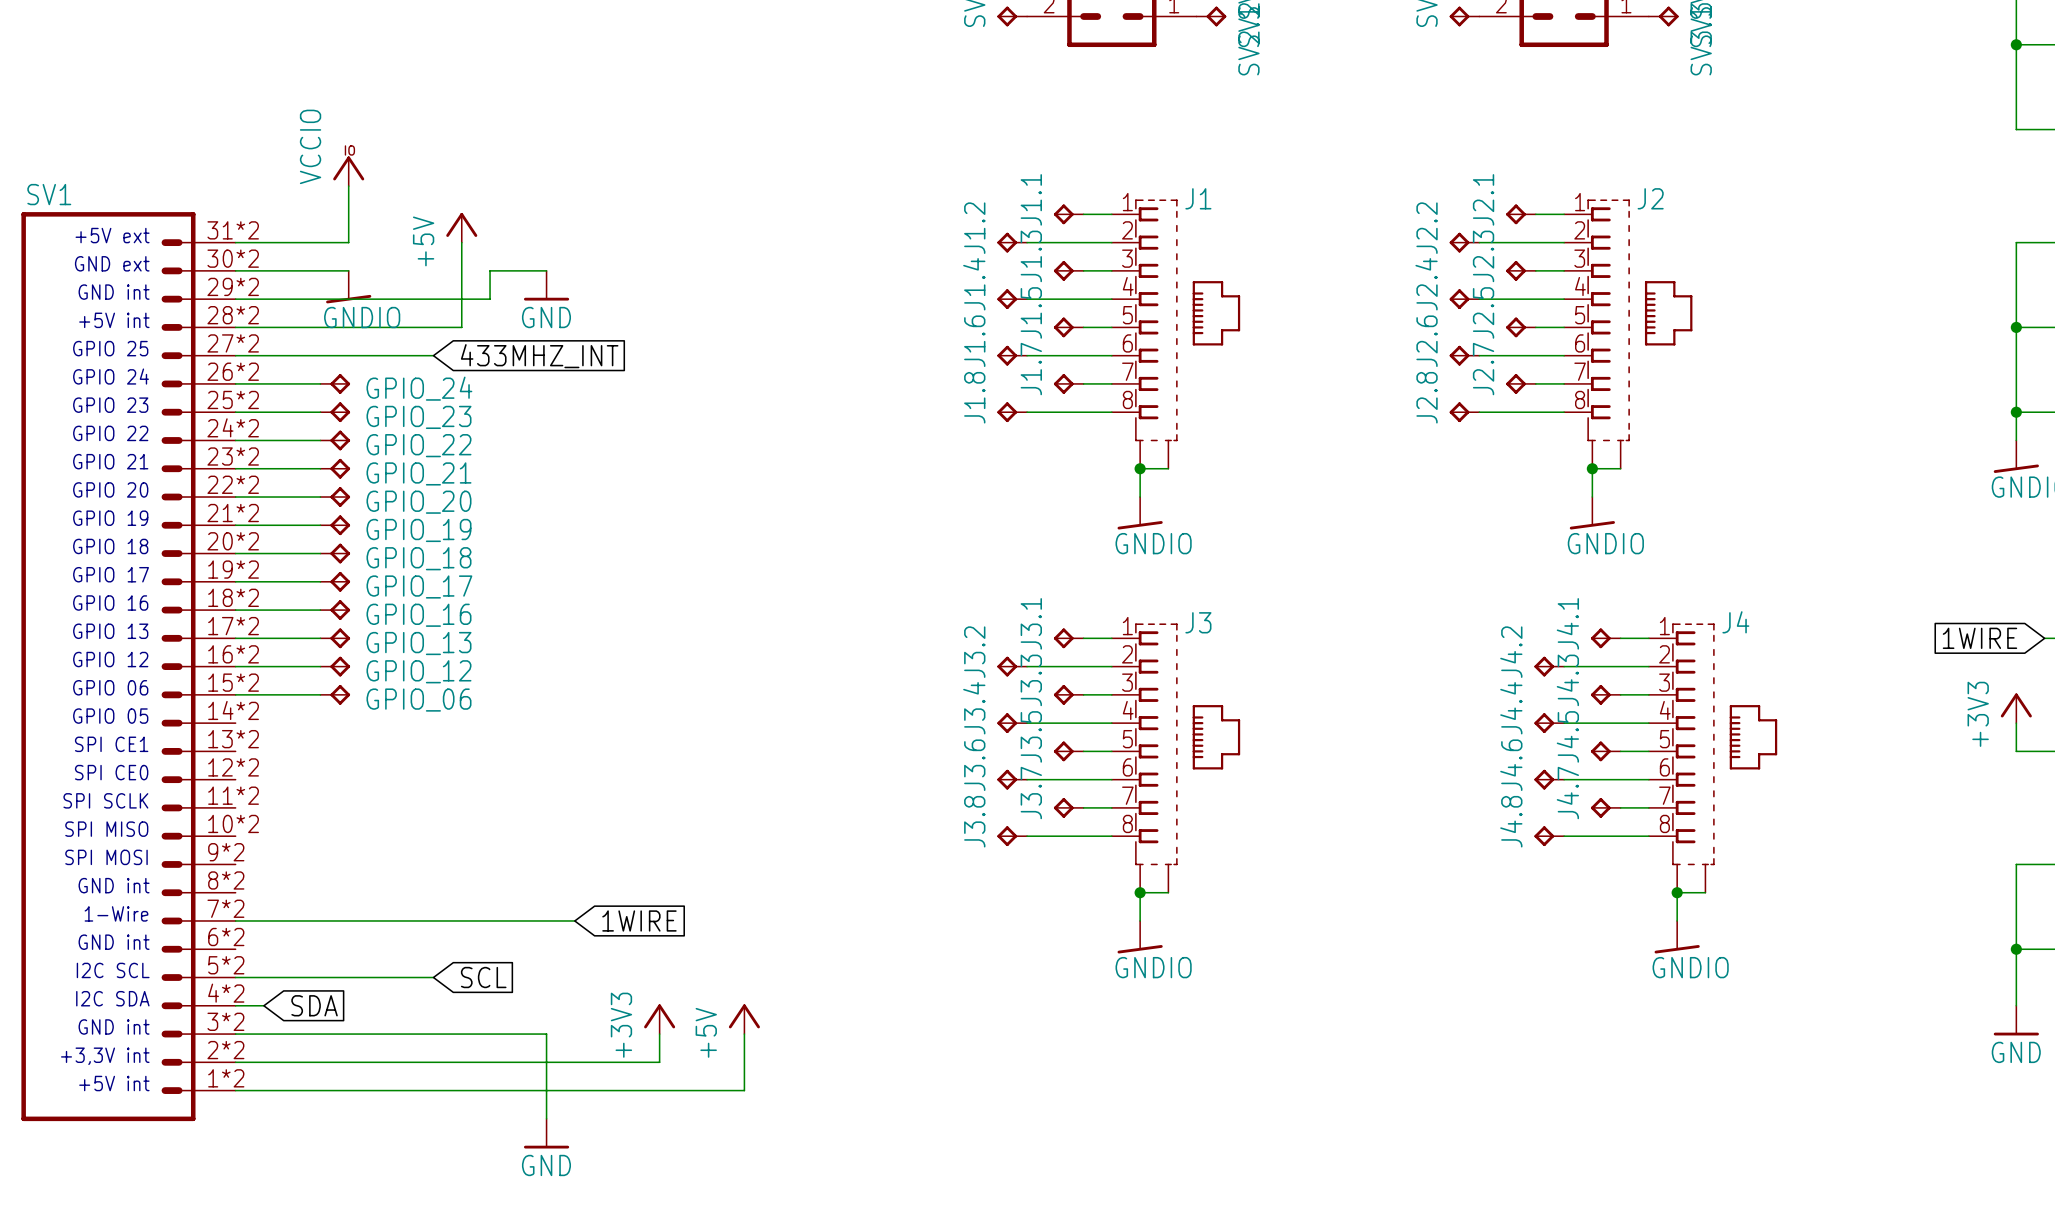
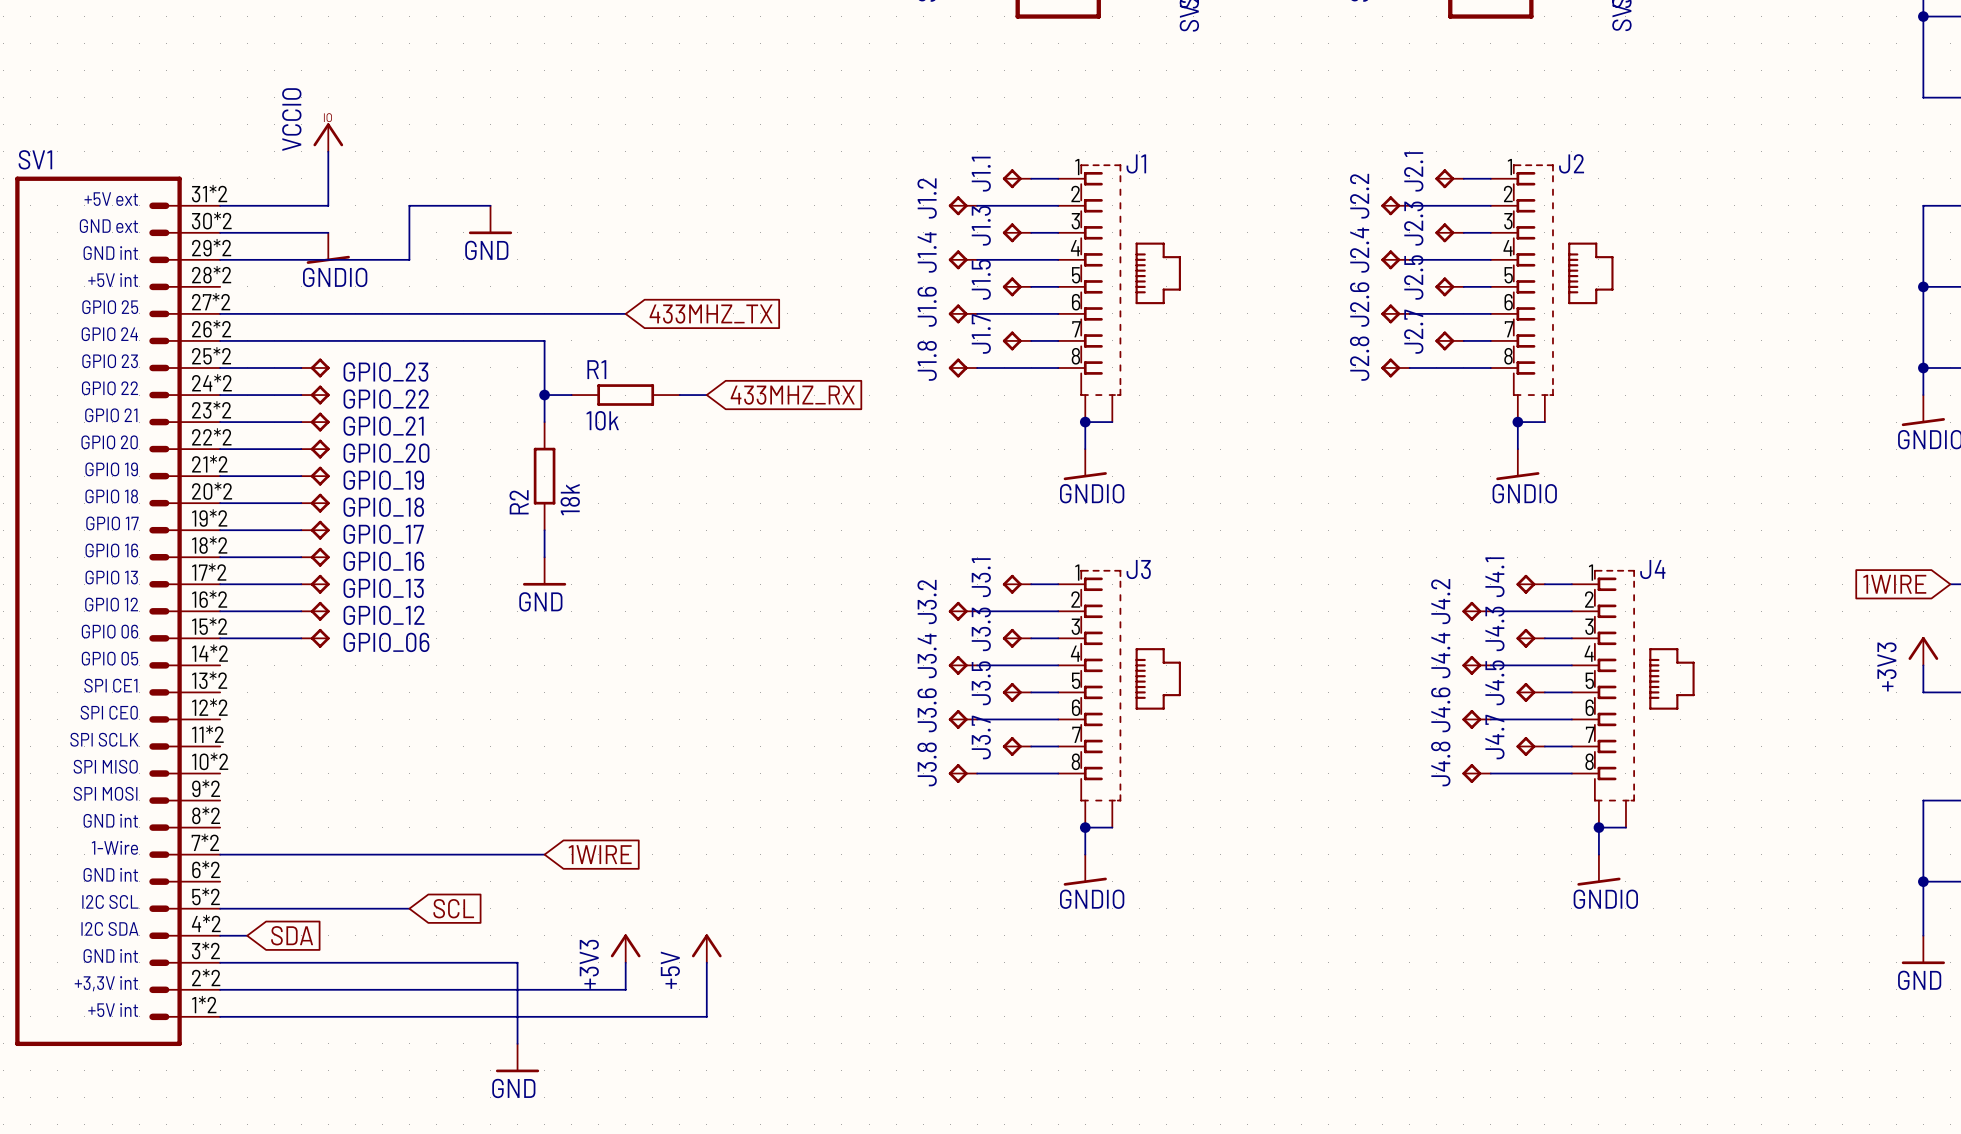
power symbol: +5V (461, 227) -> none
wire: (461, 242) (461, 327) (235, 327) -> none
wire: (546, 270) (490, 270) (490, 299) (433, 299) -> (490, 205) (409, 205) (409, 259)
power symbol position: GND (546, 285) -> GND (490, 219)
wire: none -> (409, 313) (625, 313)
global label: 433MHZ_INT (539, 356) -> 433MHZ_TX (711, 314)
wire: none -> (301, 340) (544, 340) (544, 422)
GPIO_24: (335, 383) -> none
wire: none -> (544, 395) (571, 395)
junction: none -> (544, 395)
R1: none -> 10k (625, 395)
wire: none -> (679, 395) (706, 395)
global label: none -> 433MHZ_RX (792, 395)
R2: none -> 18k (544, 476)
wire: none -> (544, 530) (544, 557)
power symbol: none -> GND (544, 571)

